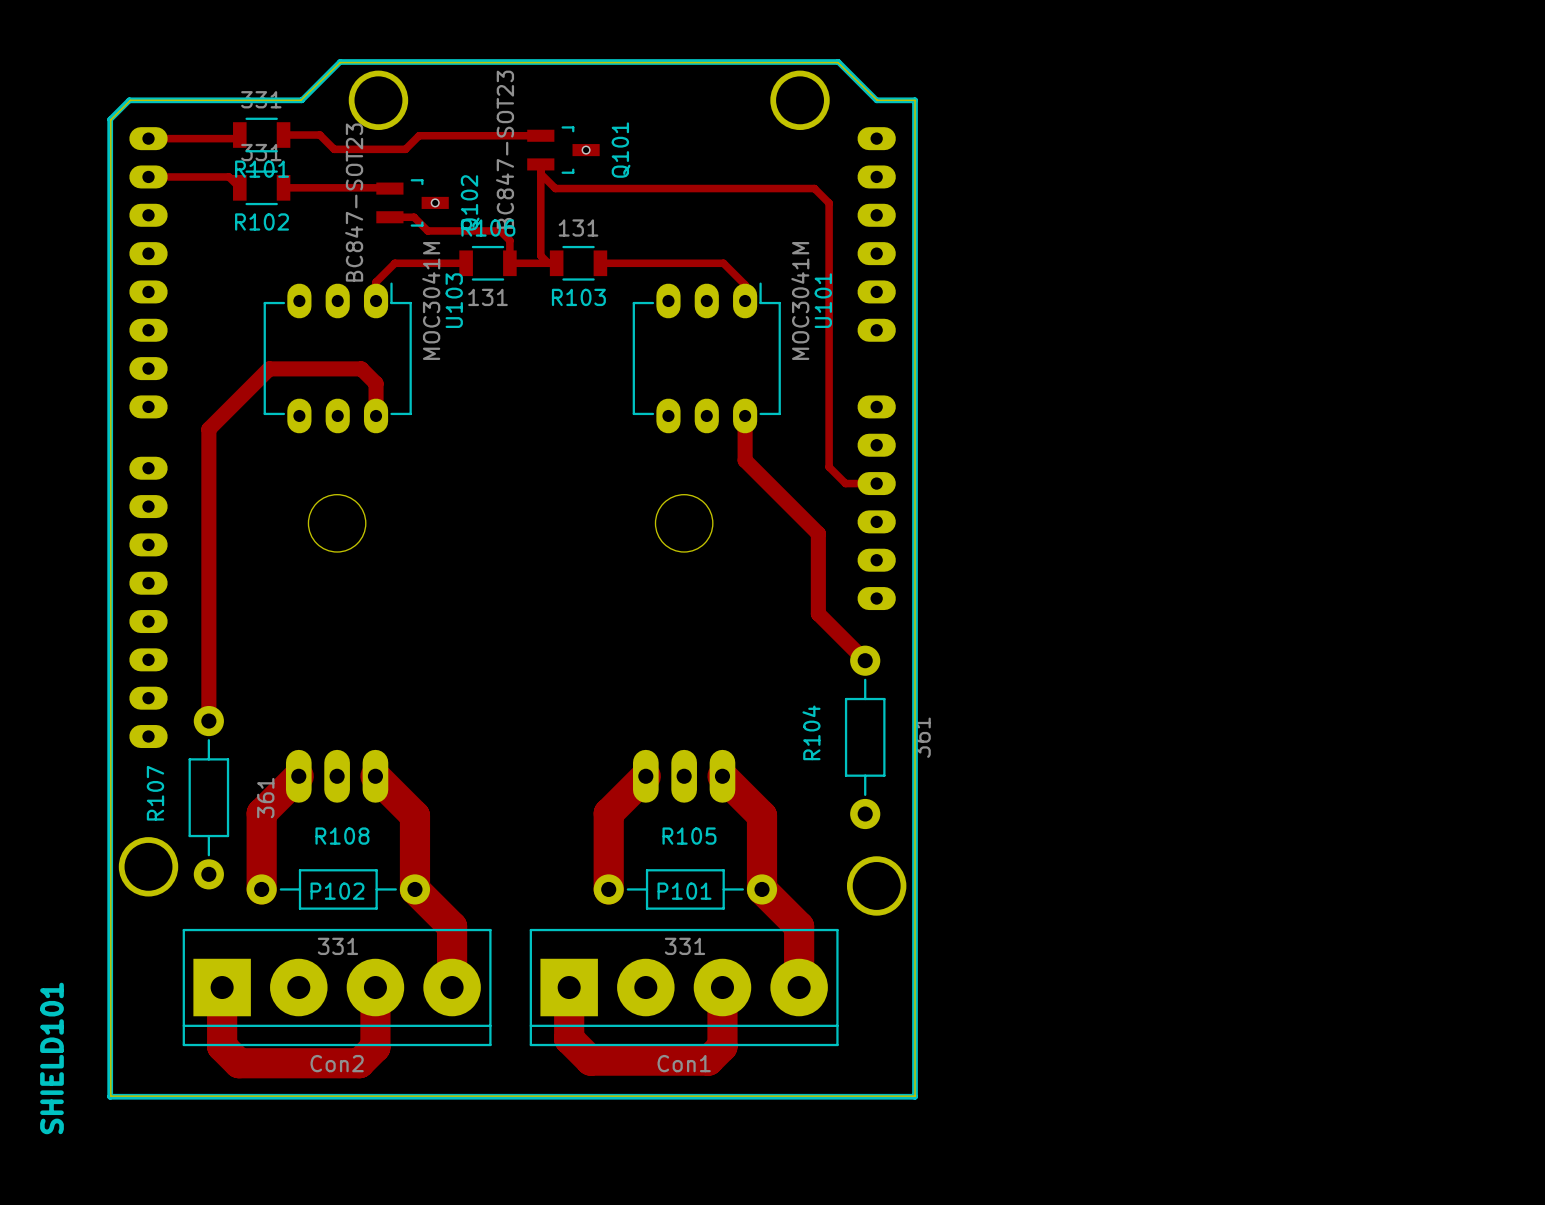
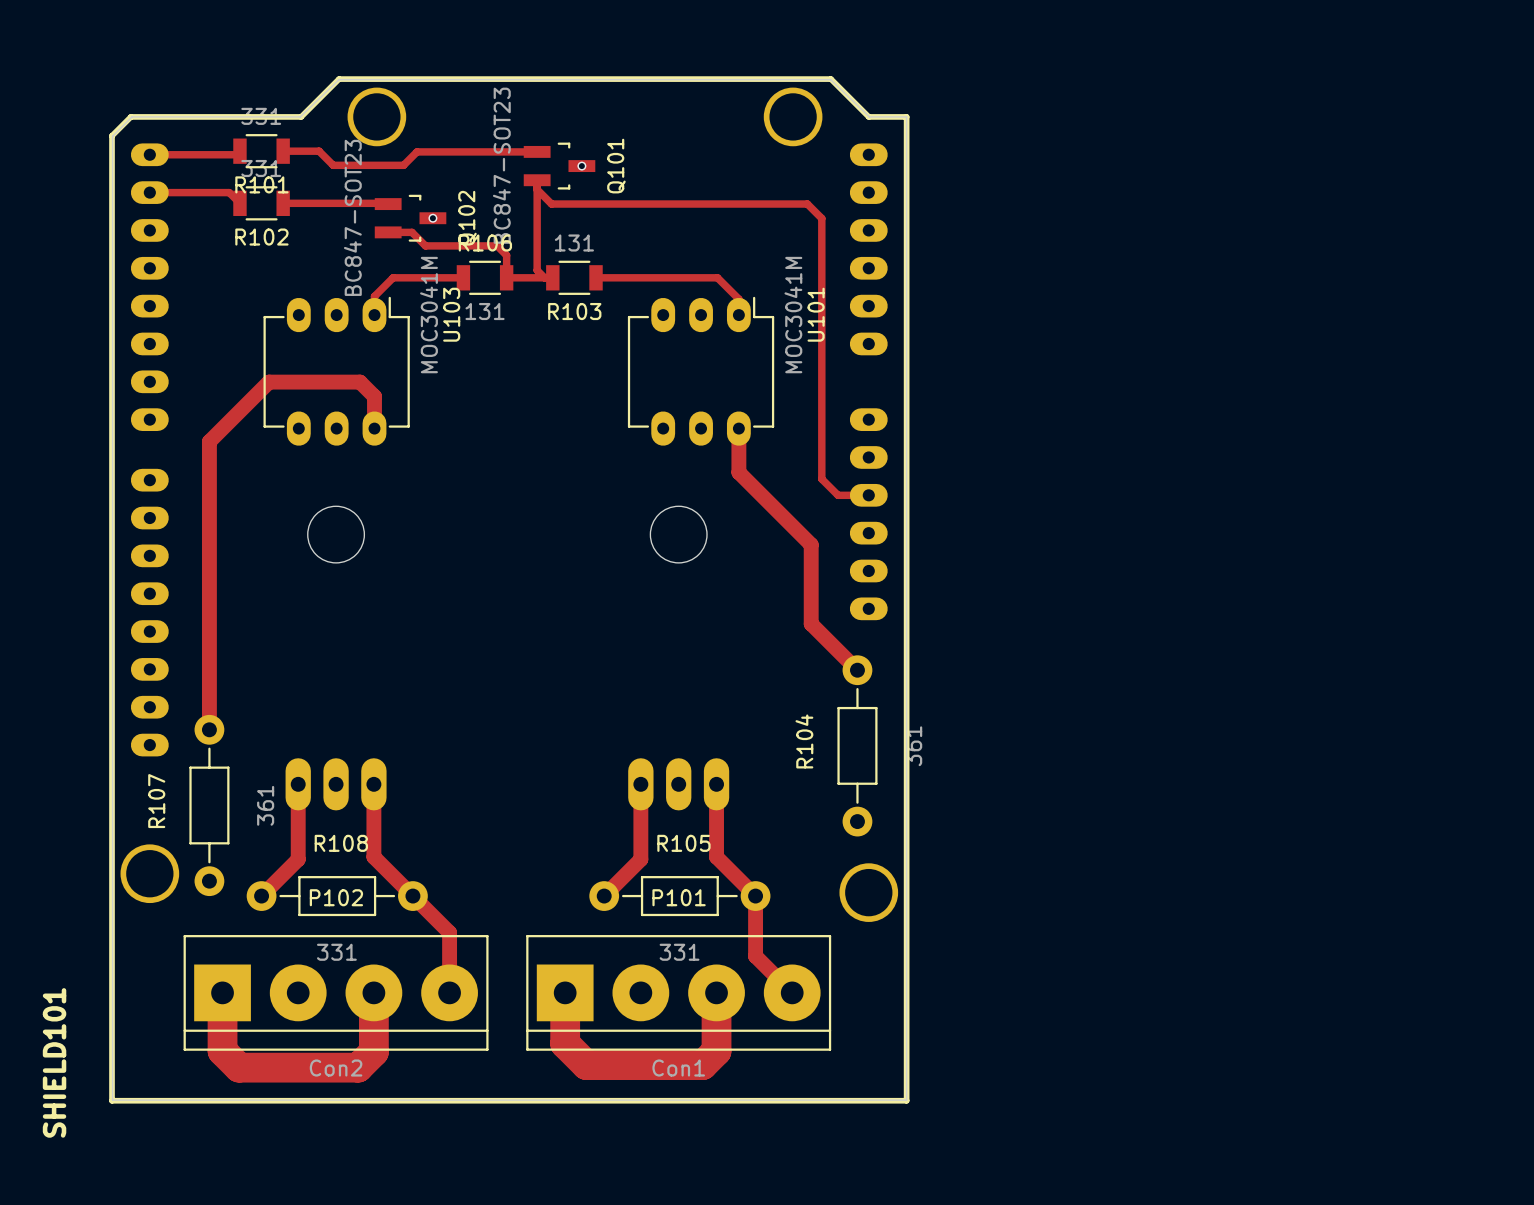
track: (298, 776) (261, 813) (261, 889) -> (298, 784) (298, 859) (261, 896)
track: (375, 776) (414, 815) (414, 889) -> (373, 784) (373, 857) (412, 896)
track: (645, 776) (608, 813) (608, 889) -> (640, 784) (640, 859) (604, 896)
track: (722, 776) (762, 815) (762, 889) (799, 926) (799, 987) -> (716, 784) (716, 857) (755, 896) (755, 956) (792, 992)
track width: thick (414, 889) (452, 926) (452, 987) -> thin (412, 896) (449, 932) (449, 992)

